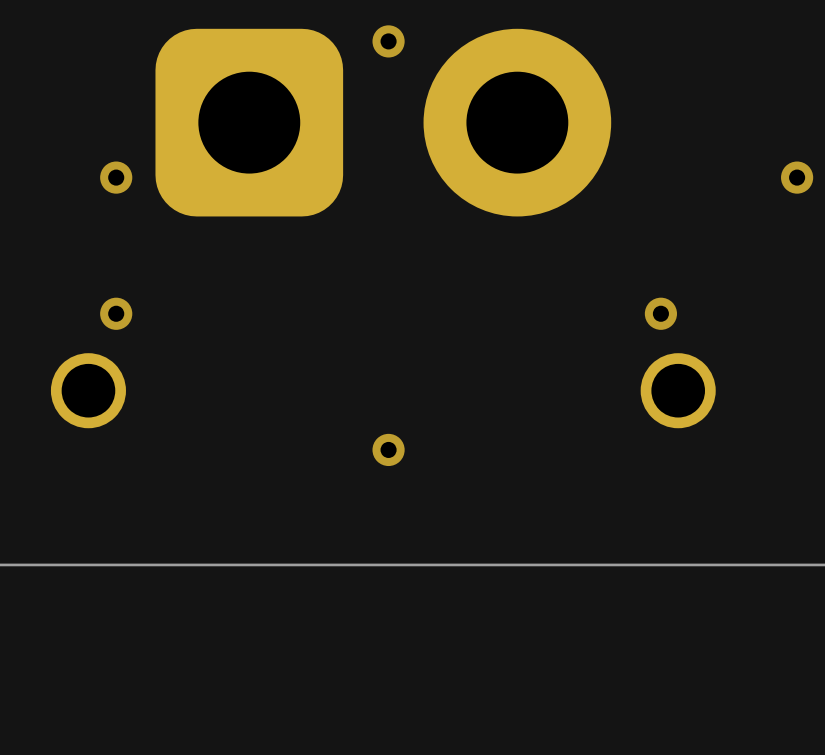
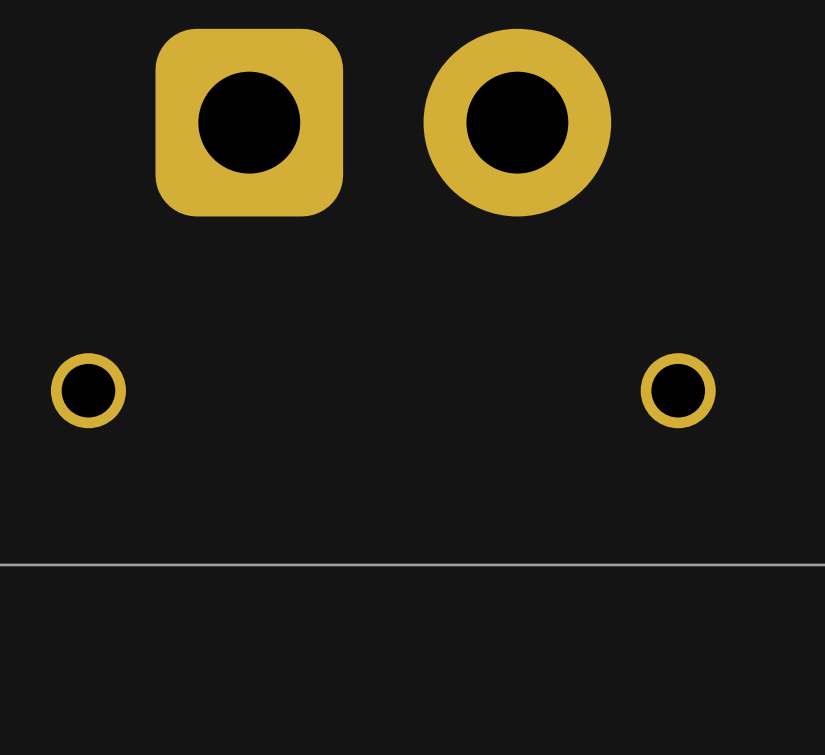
via: (388, 41) -> none
via: (116, 177) -> none
via: (797, 177) -> none
via: (116, 313) -> none
via: (660, 313) -> none
via: (388, 449) -> none

